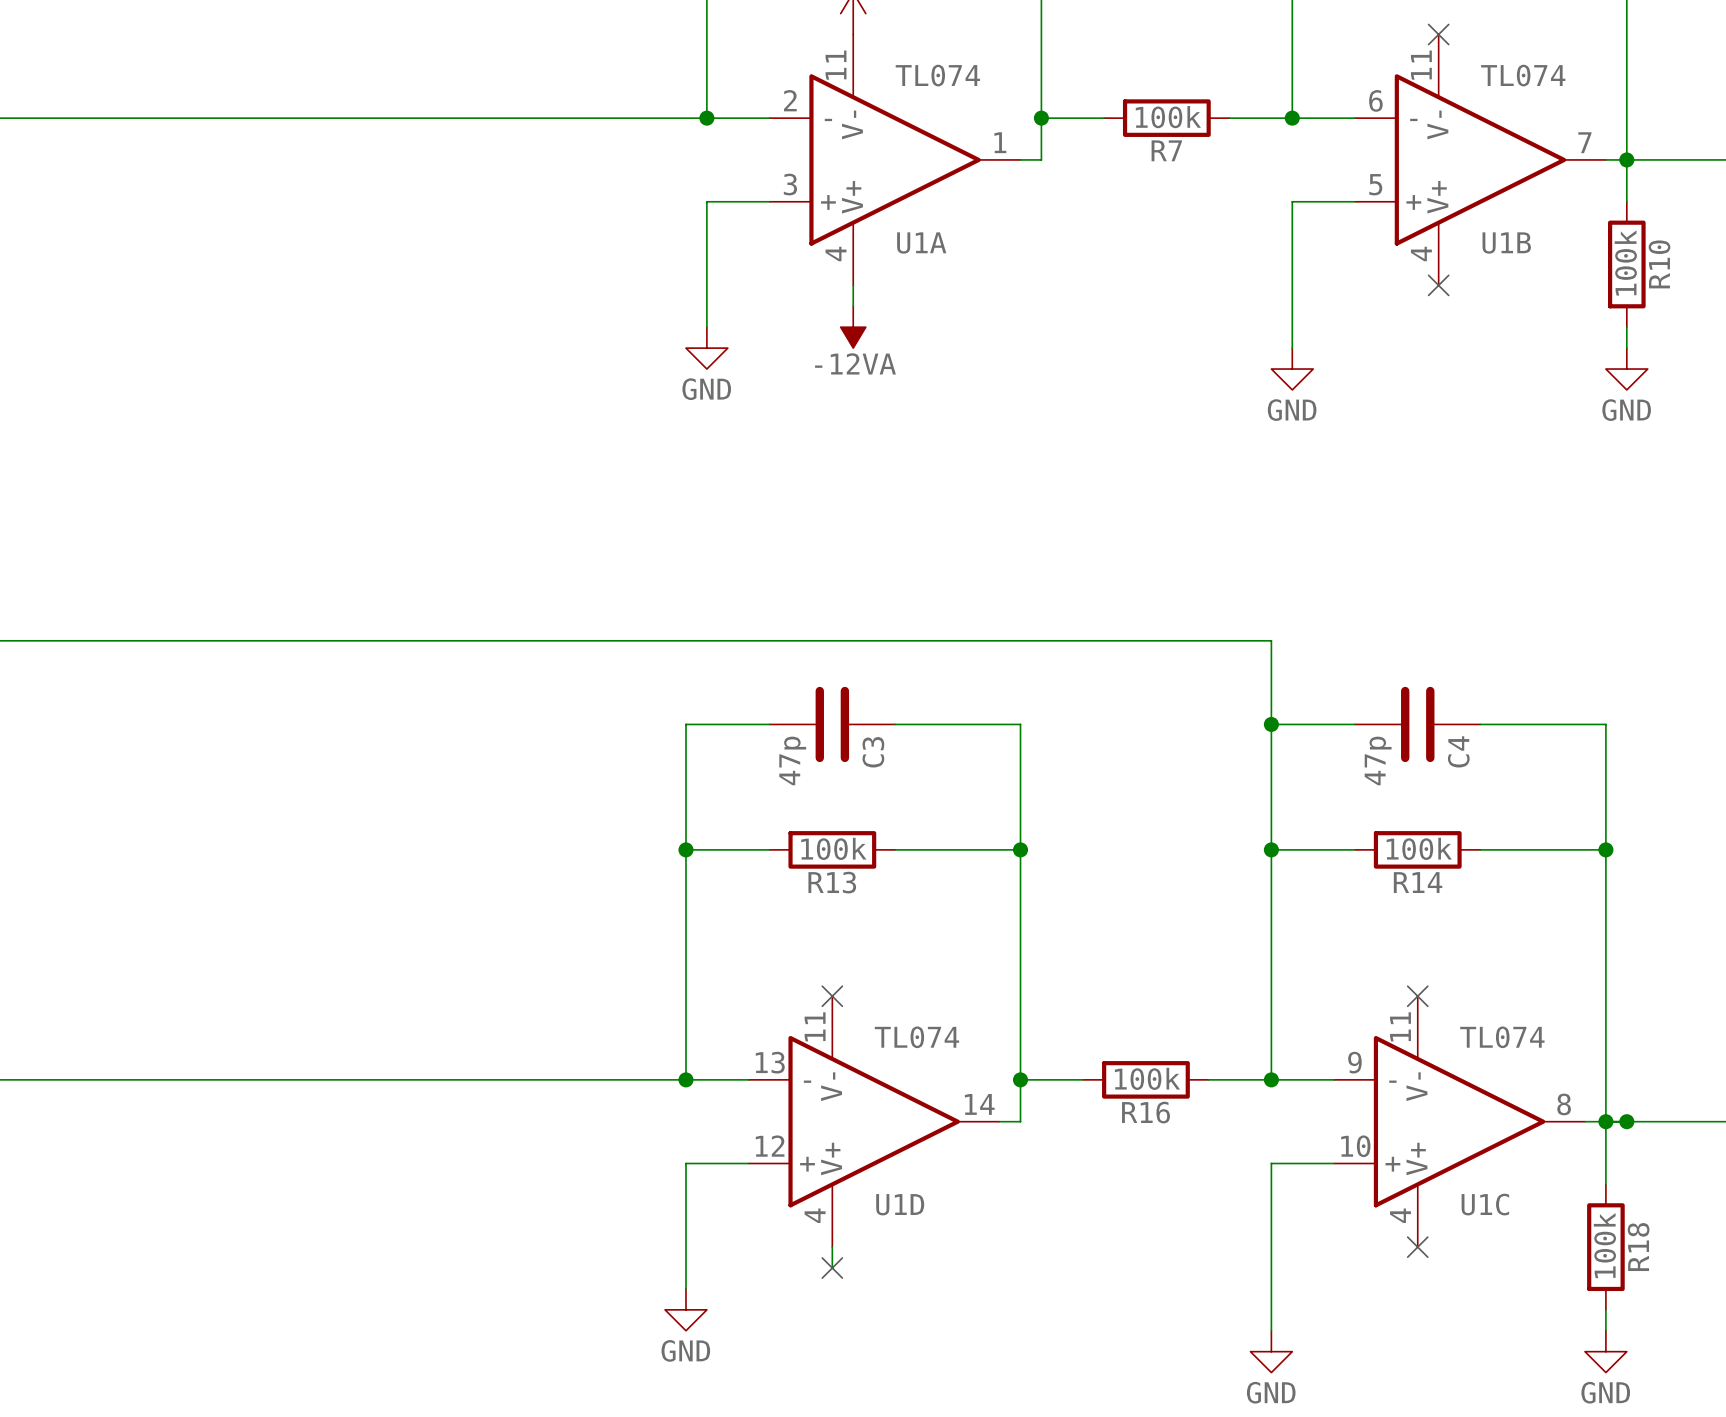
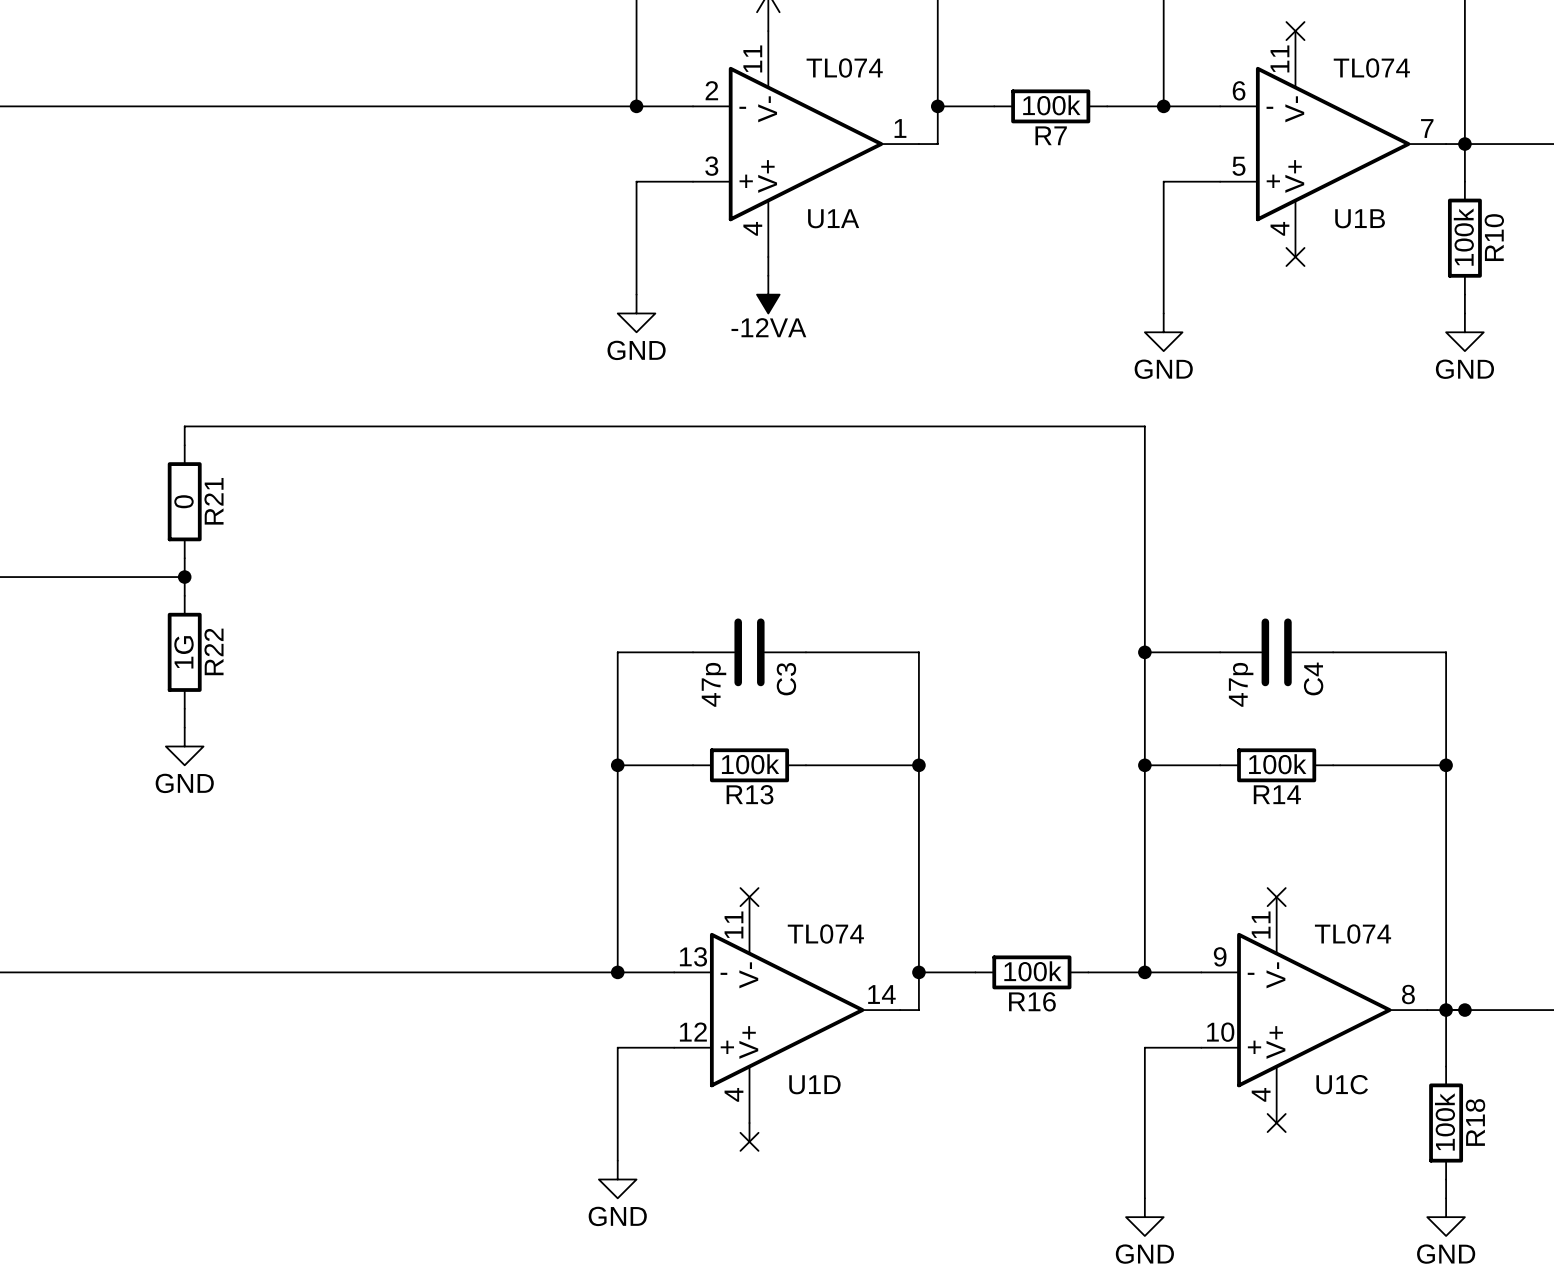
R21: none -> 0 (184, 501)
wire: none -> (184, 558) (184, 595)
wire: (205, 640) (1271, 640) -> (184, 445) (184, 426) (1144, 426) (1144, 577)
junction: none -> (184, 577)
R22: none -> 1G (184, 652)
wire: none -> (184, 708) (184, 727)
power symbol: none -> GND (184, 746)

